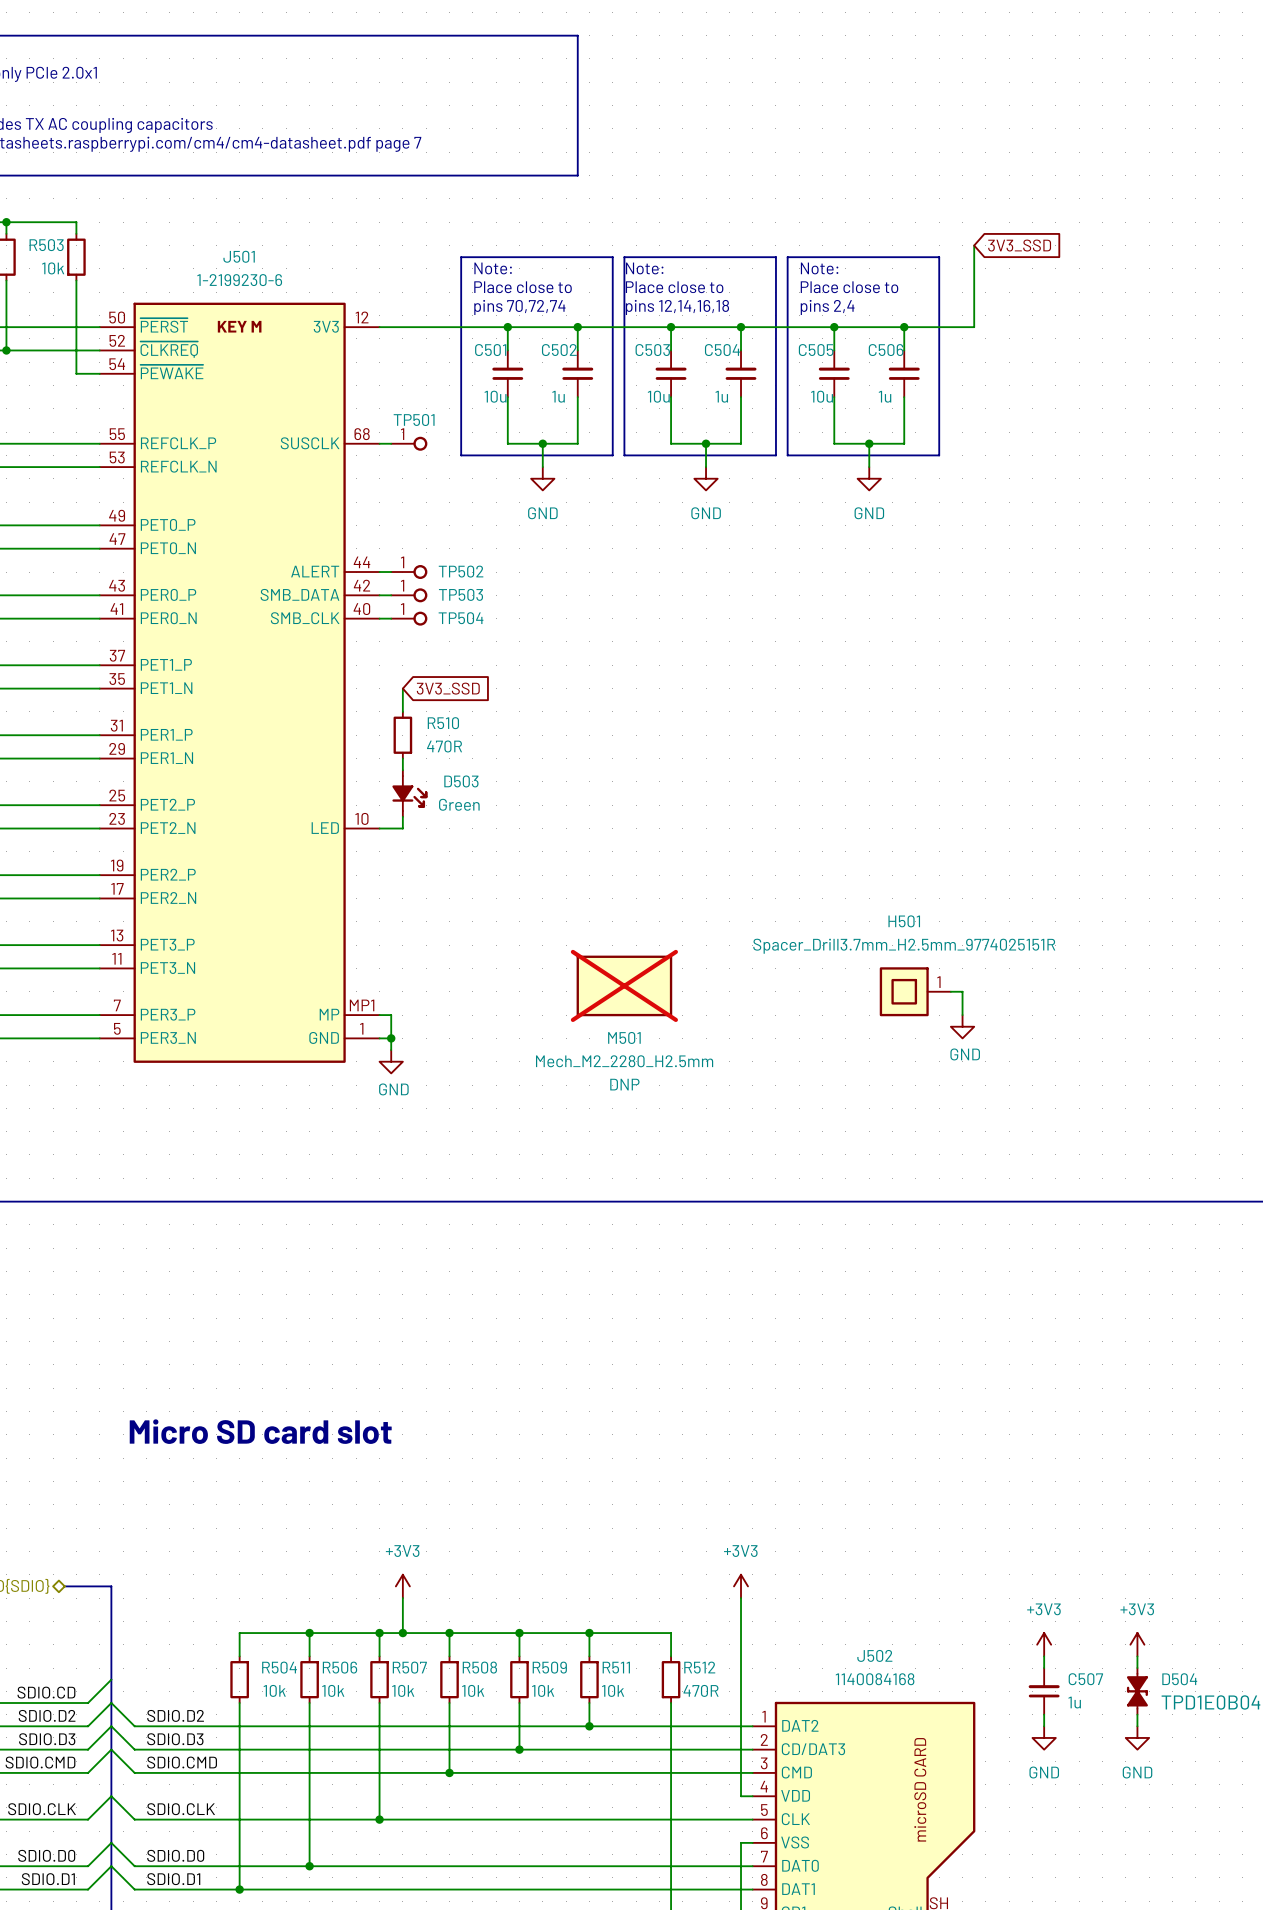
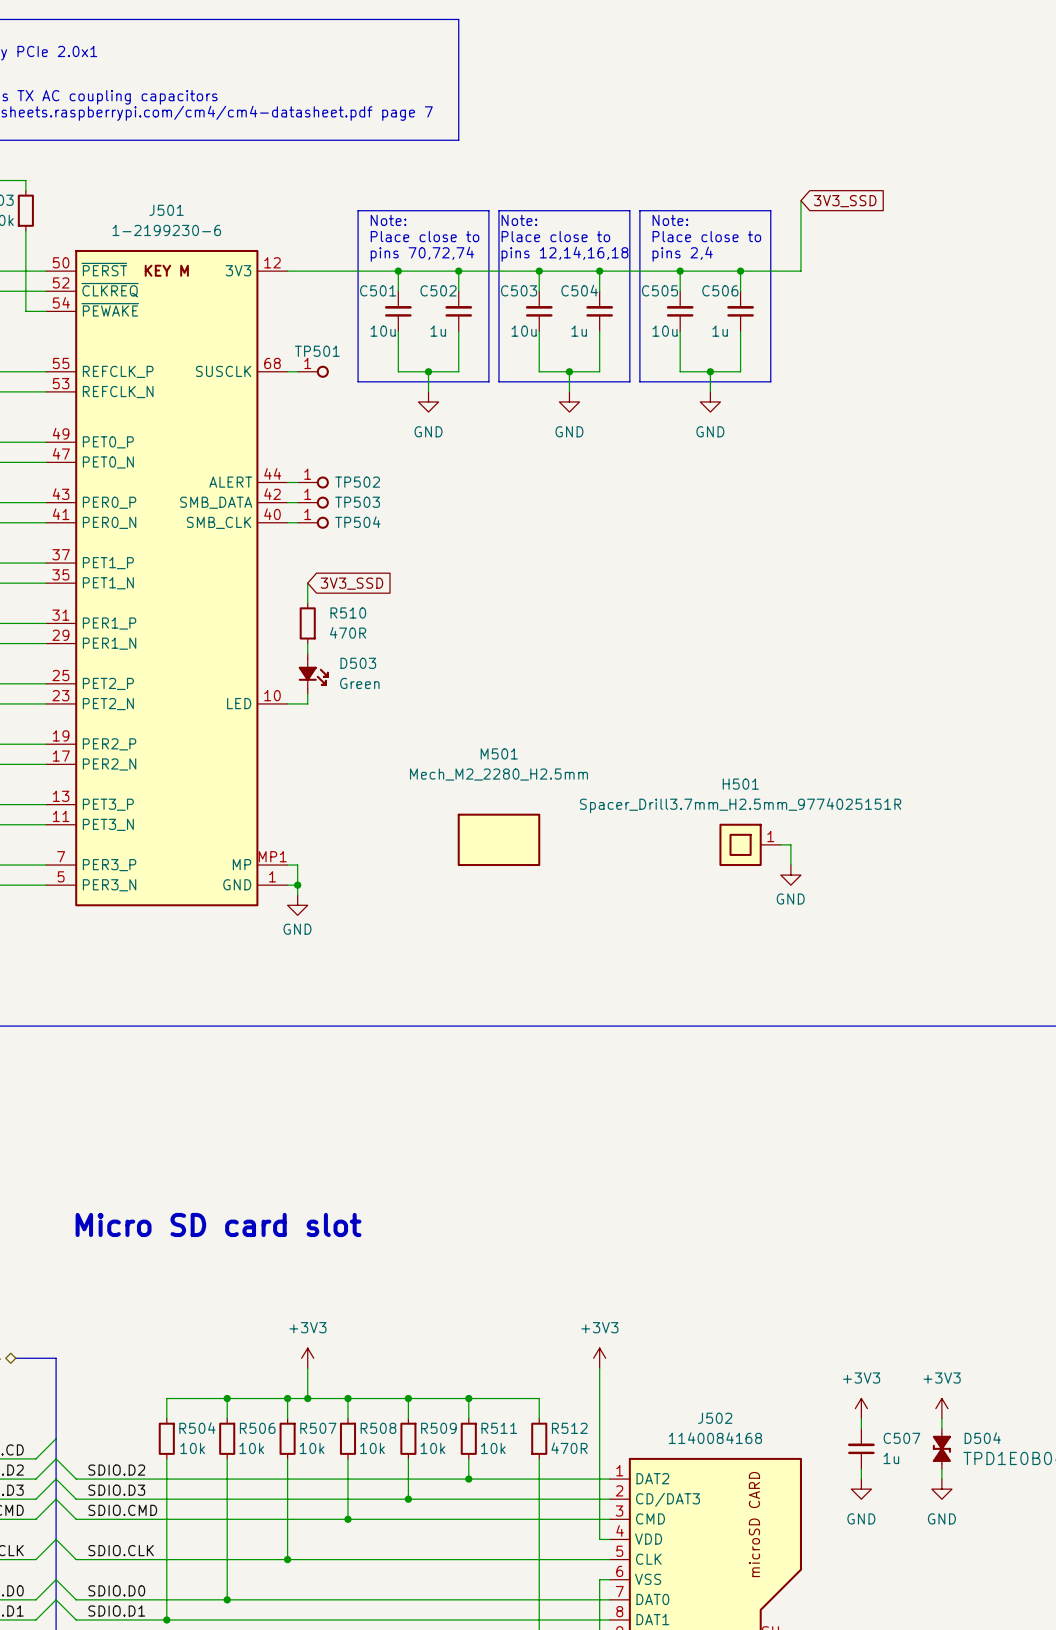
M501 do-not-place cross: (624, 985) -> none
M501 name position: M501 (624, 1037) -> M501 (499, 753)
M501 value position: Mech_M2_2280_H2.5mm (624, 1061) -> Mech_M2_2280_H2.5mm (498, 774)
M501 text: DNP (624, 1084) -> none

